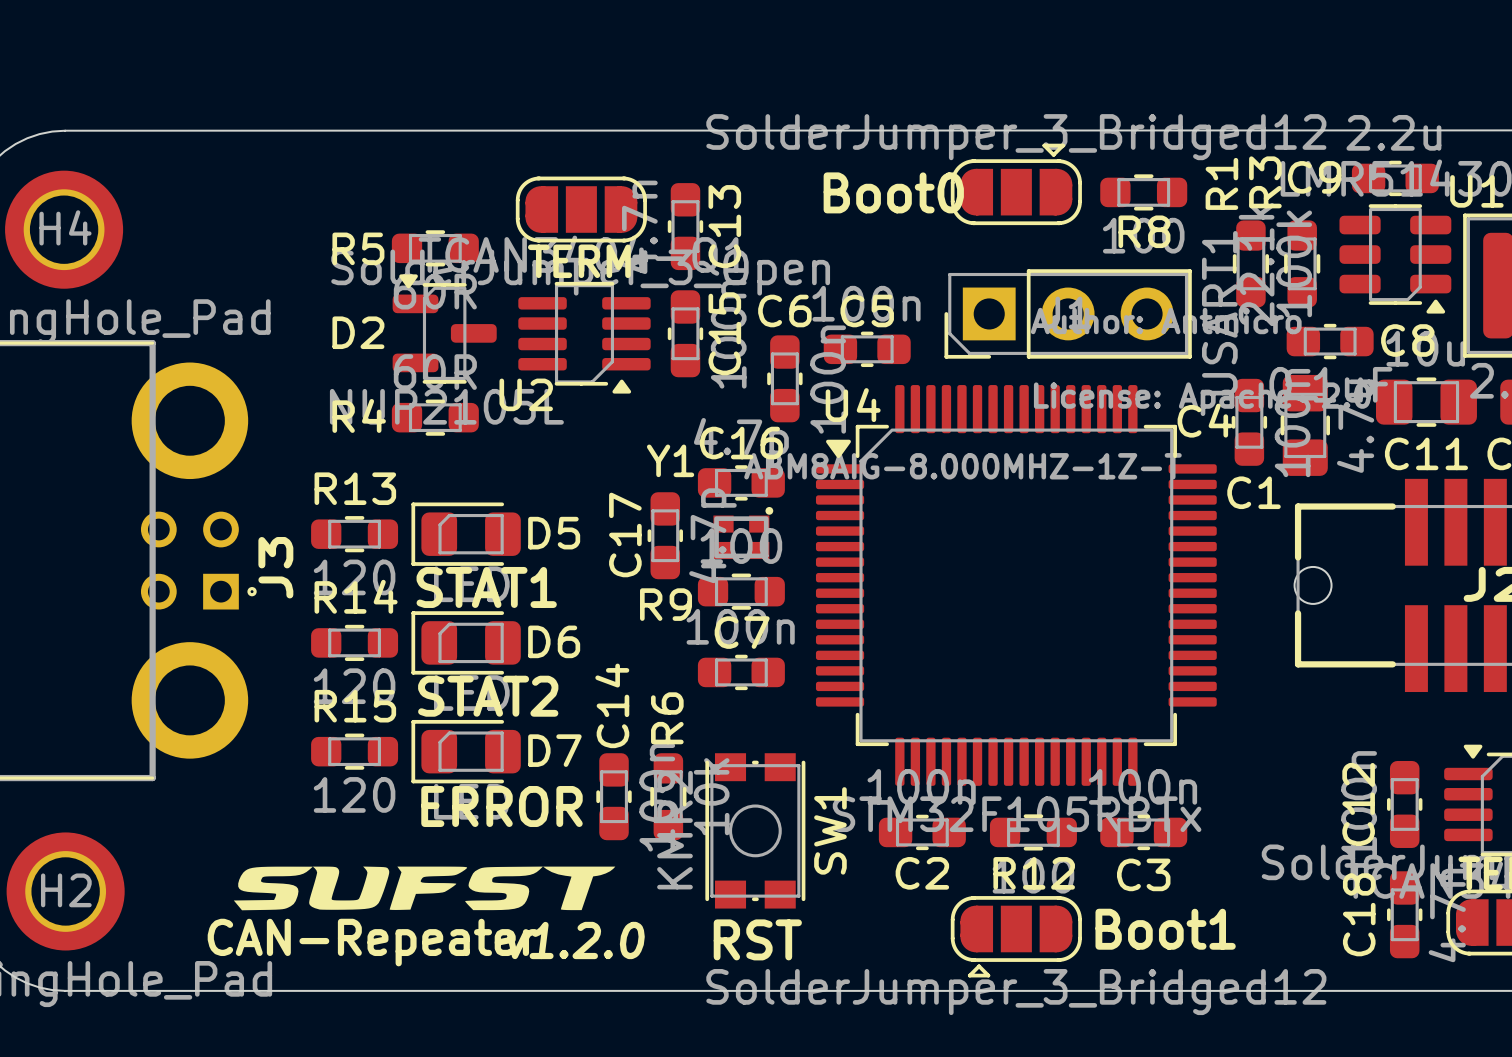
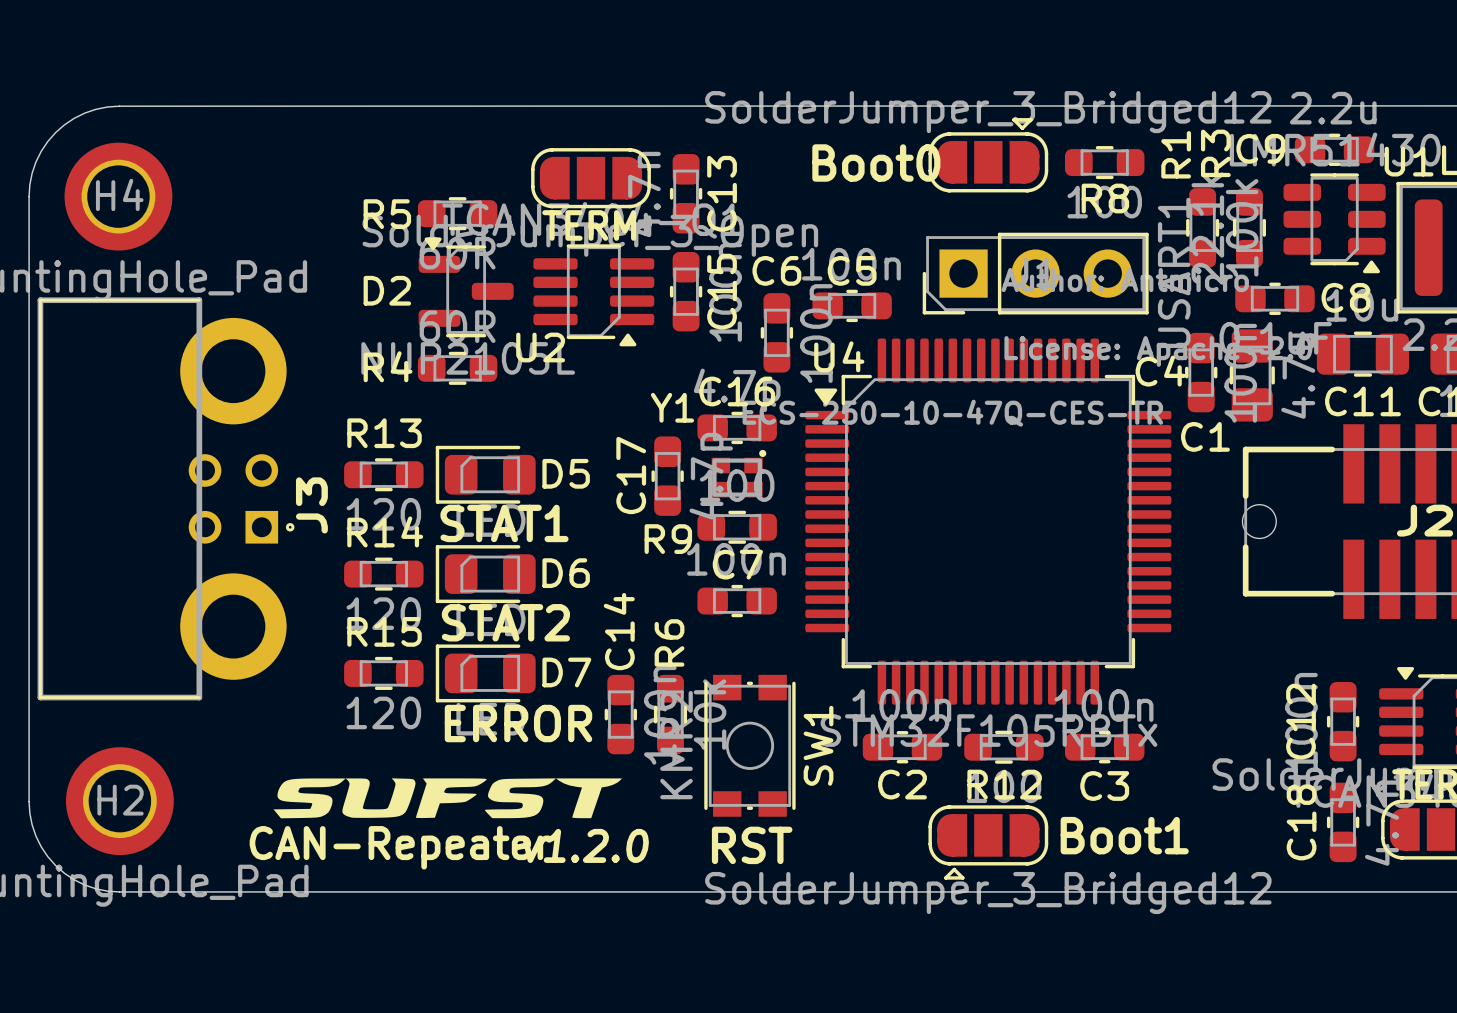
Y1 value: ABM8AIG-8.000MHZ-1Z-T (962, 466) -> ECS-250-10-47Q-CES-TR (952, 413)

